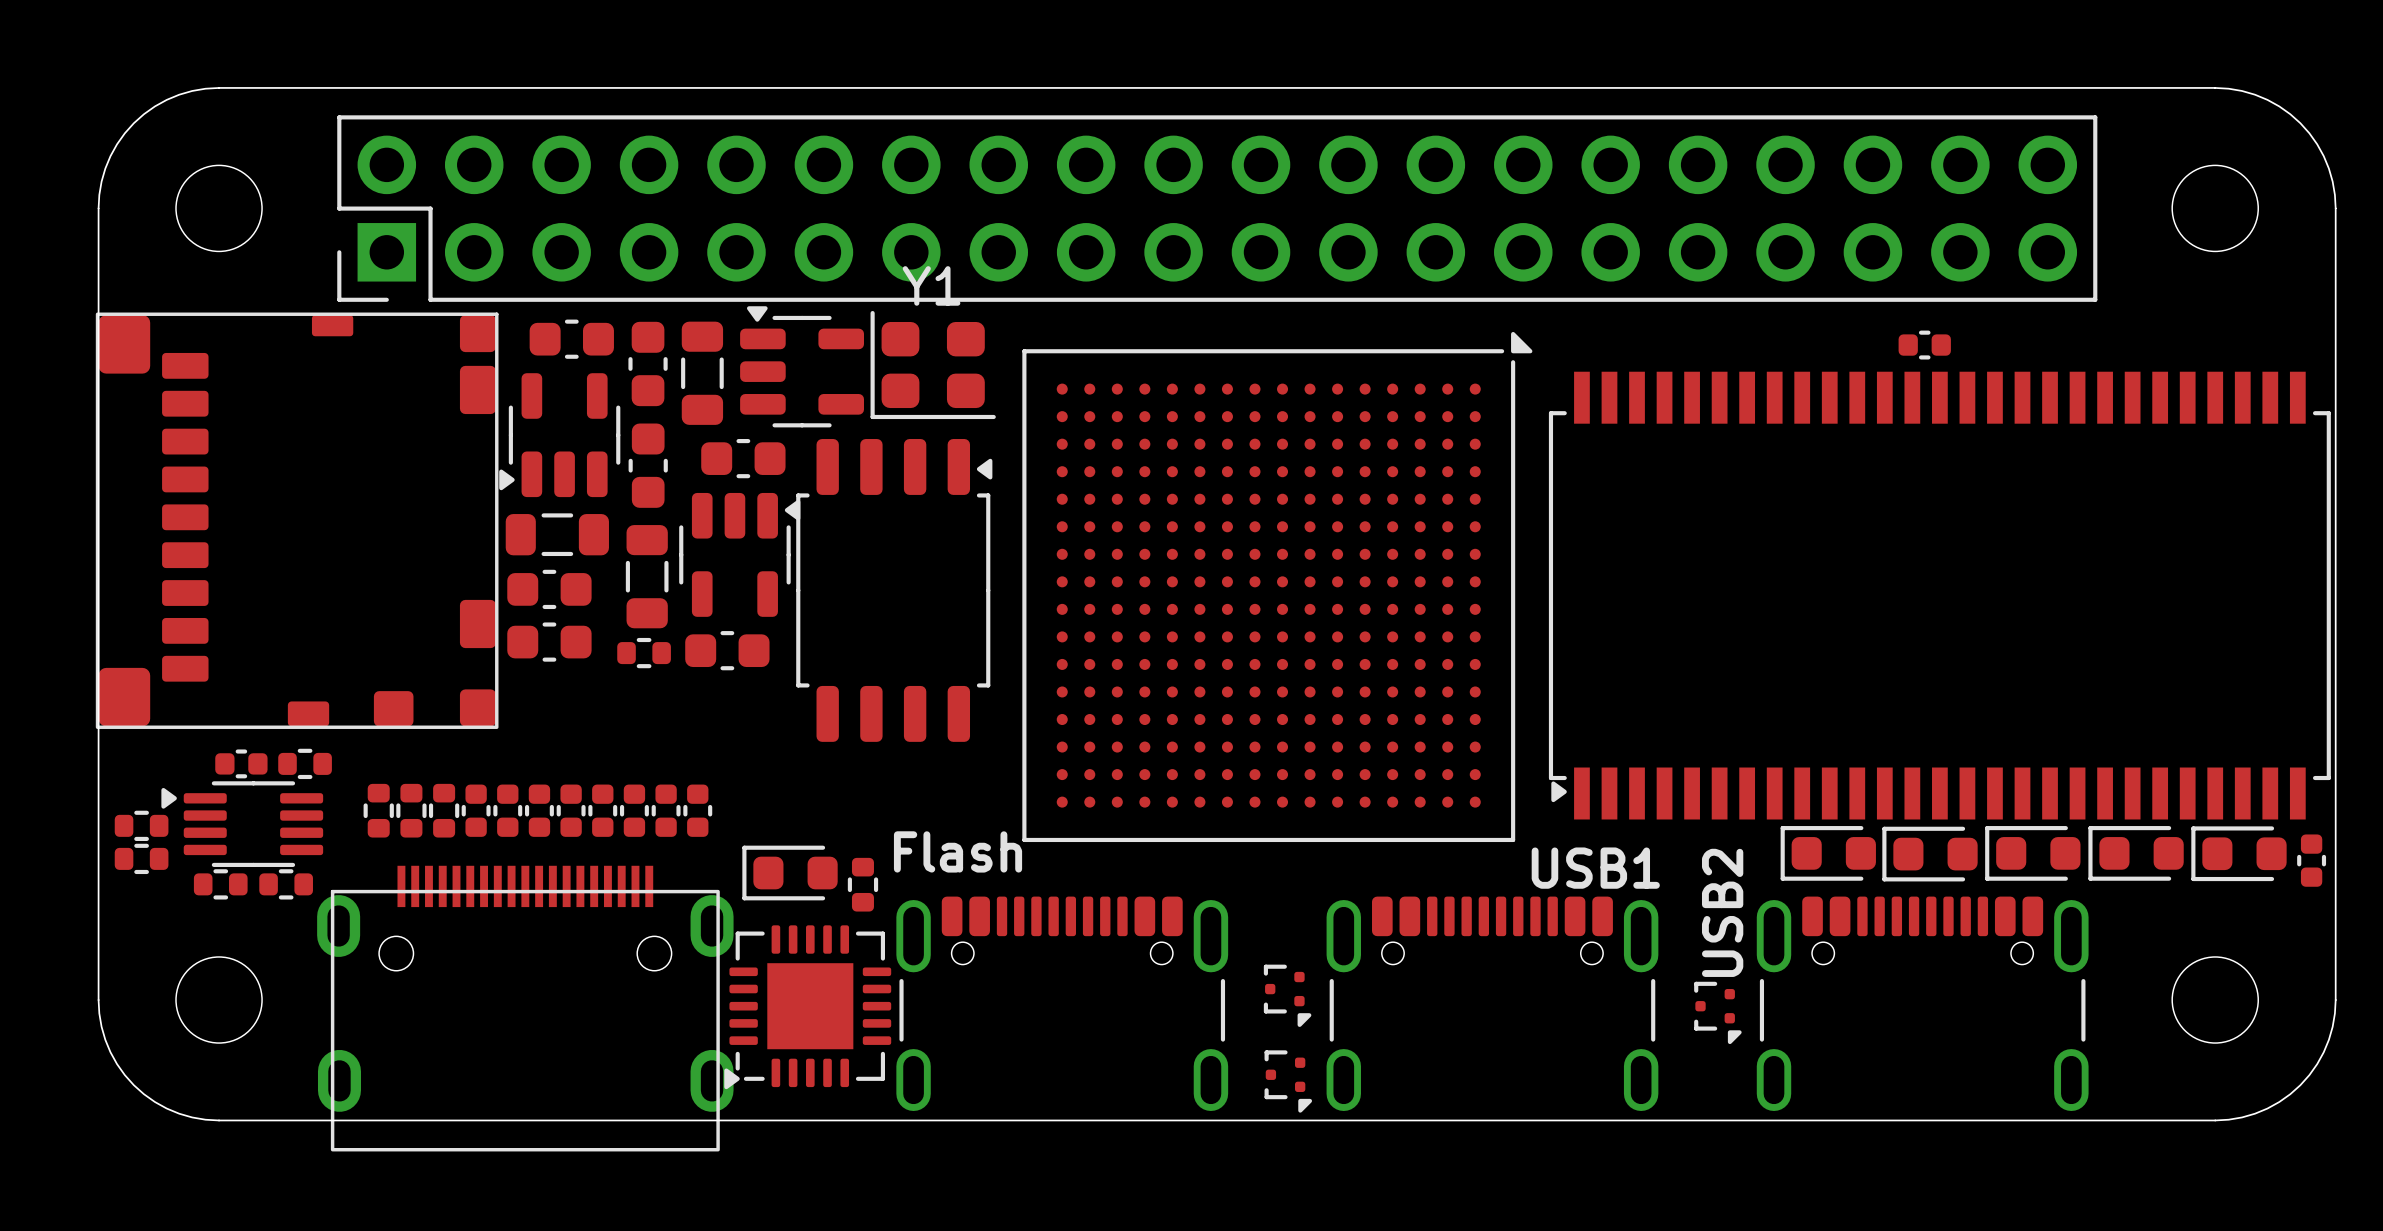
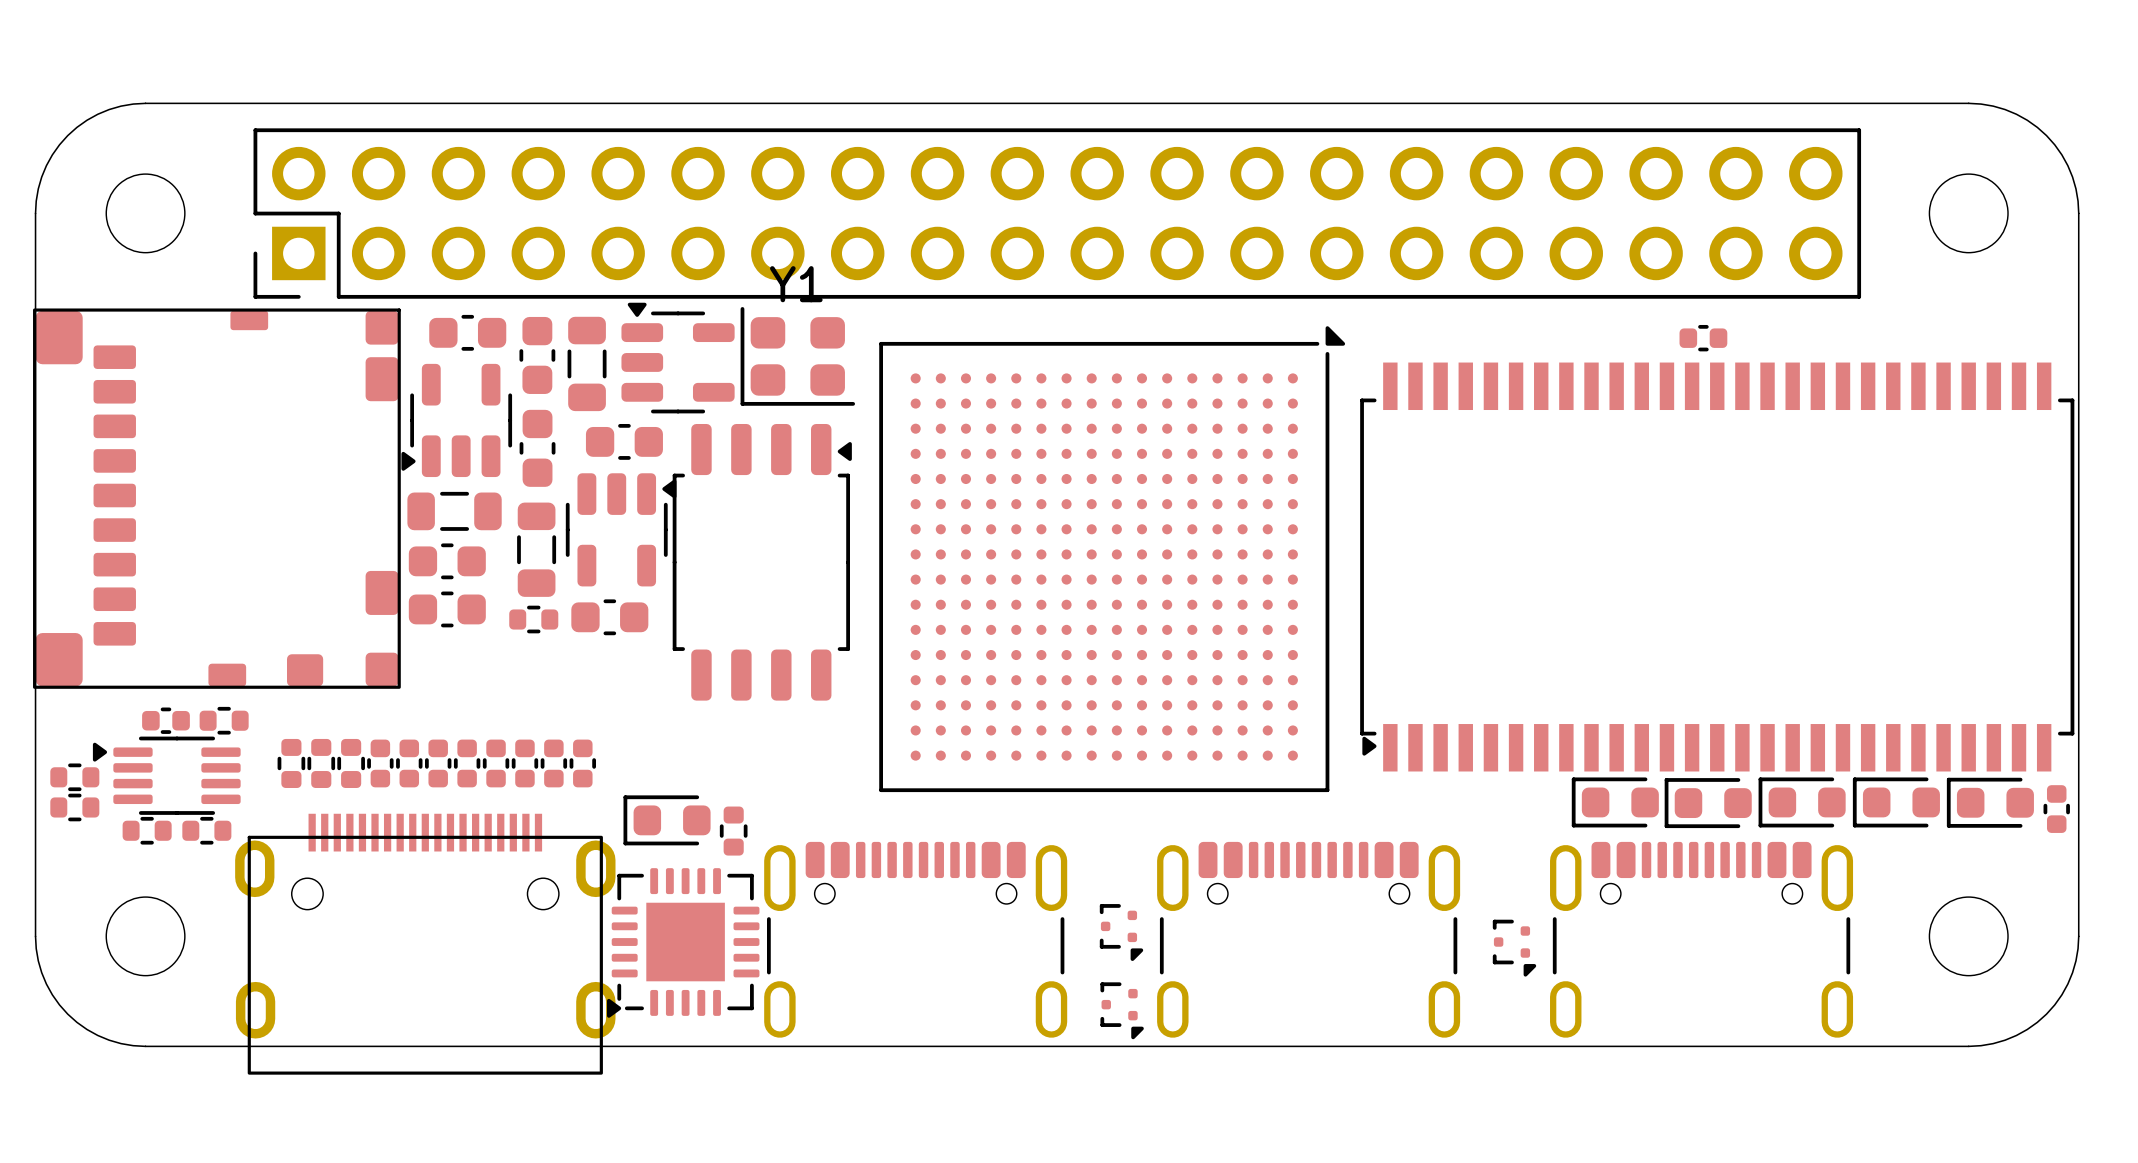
text: Flash (958, 851) -> none
text: USB1 (1595, 868) -> none
text: USB2 (1722, 912) -> none

